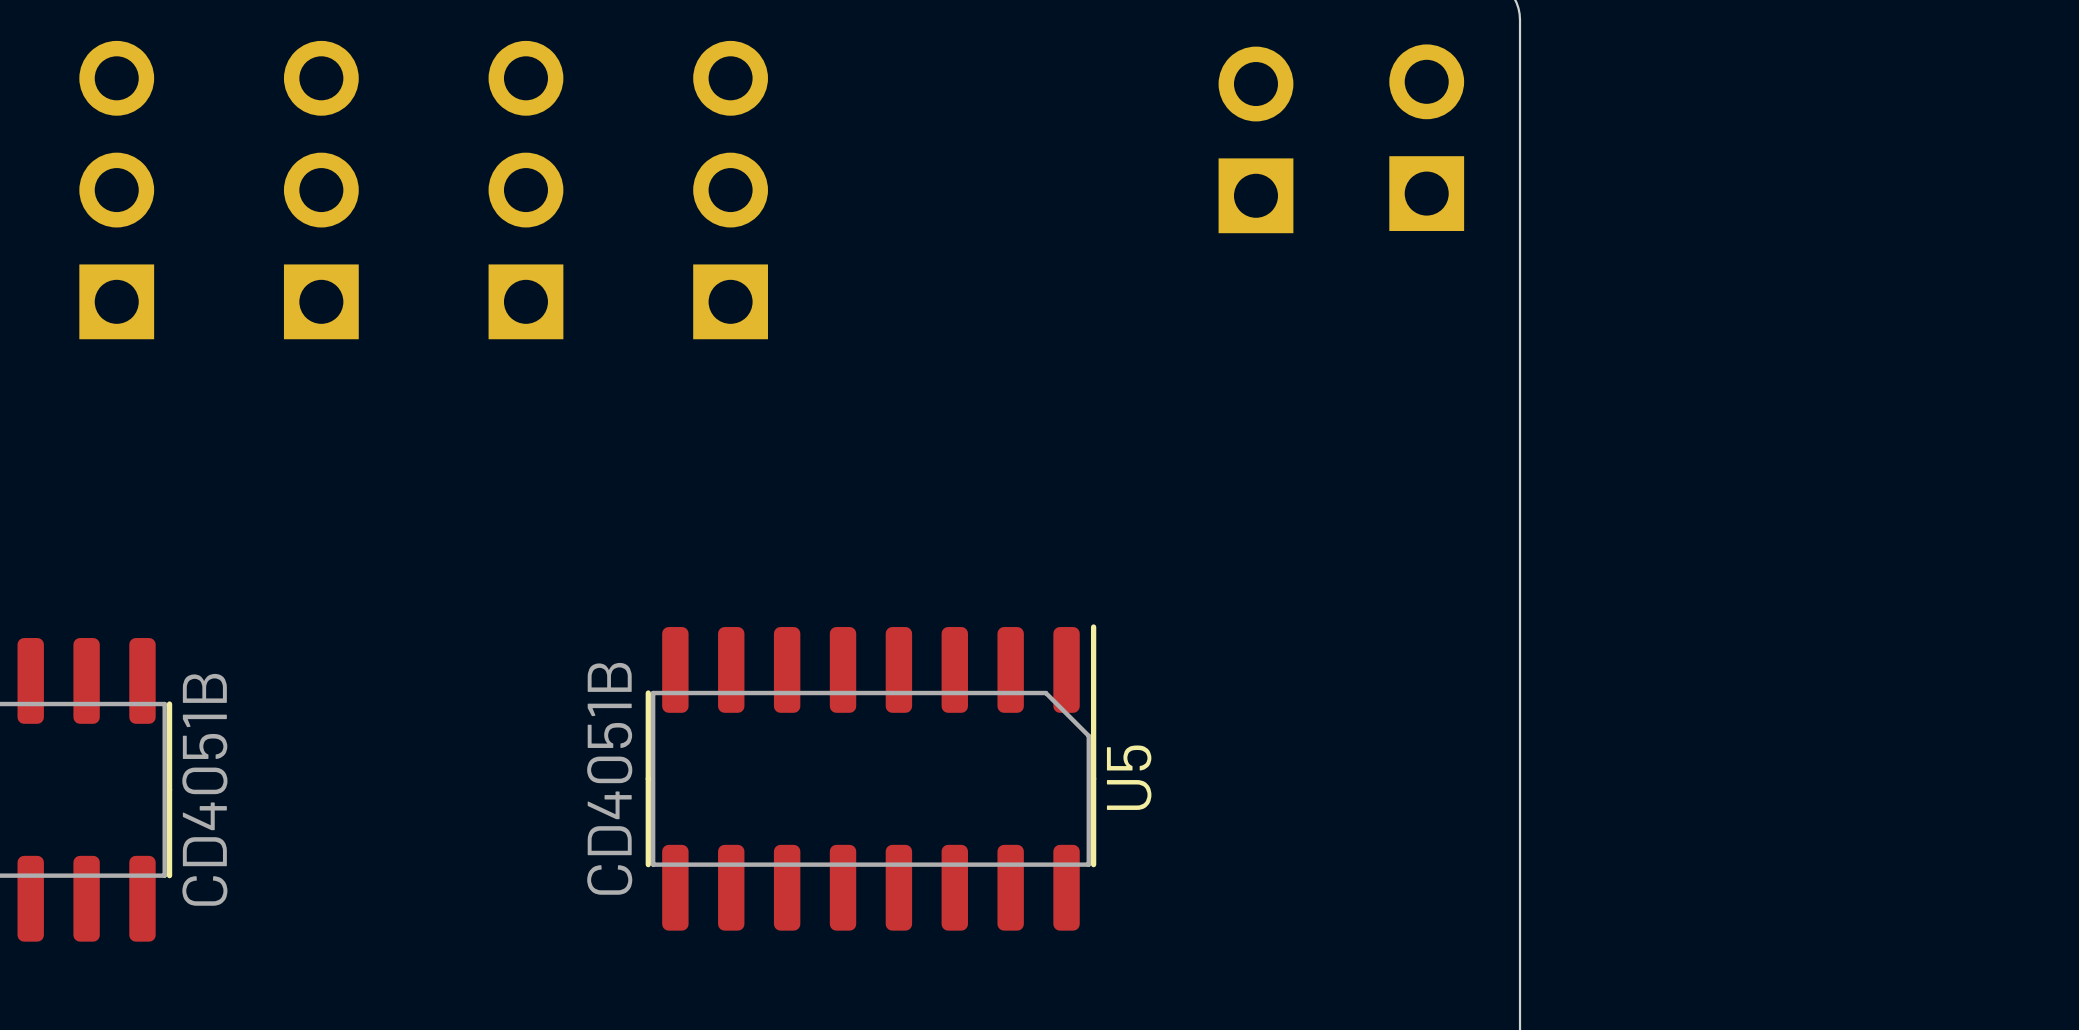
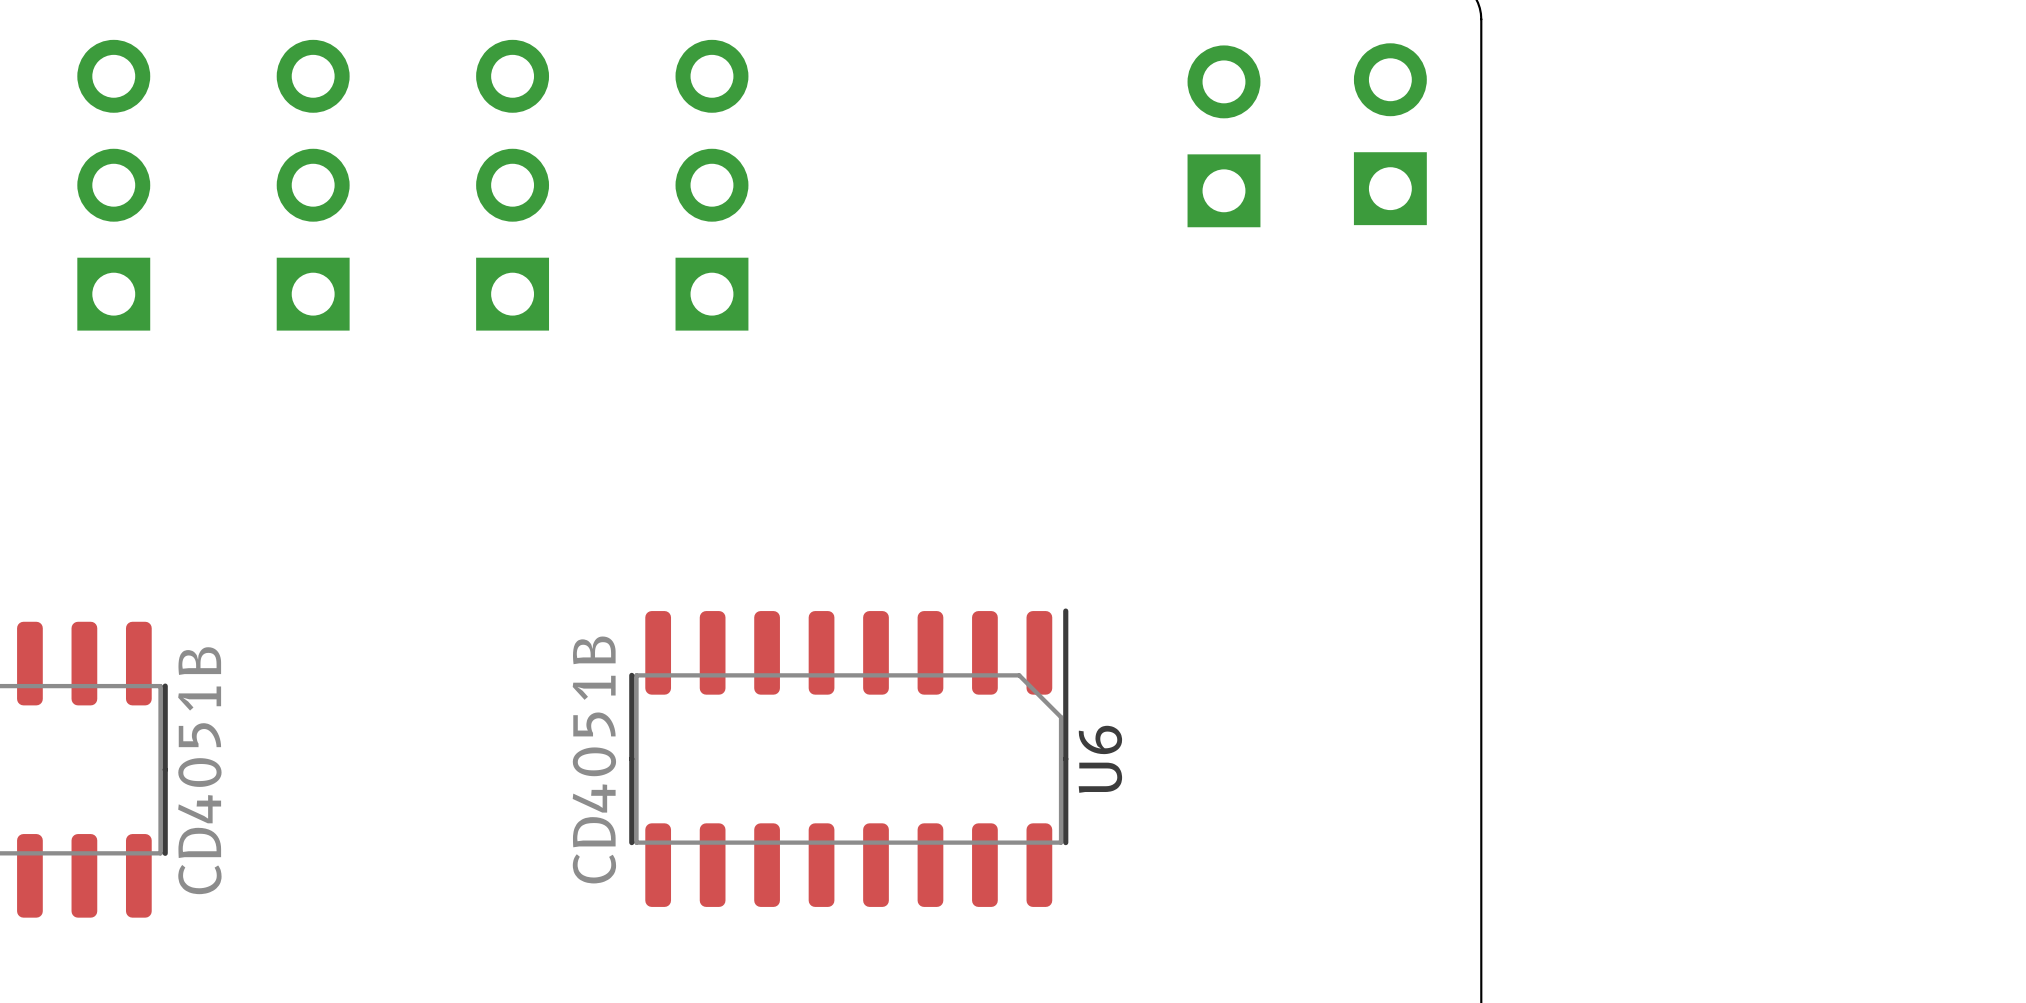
U5 name: U5 (1129, 777) -> U6 (1100, 759)

